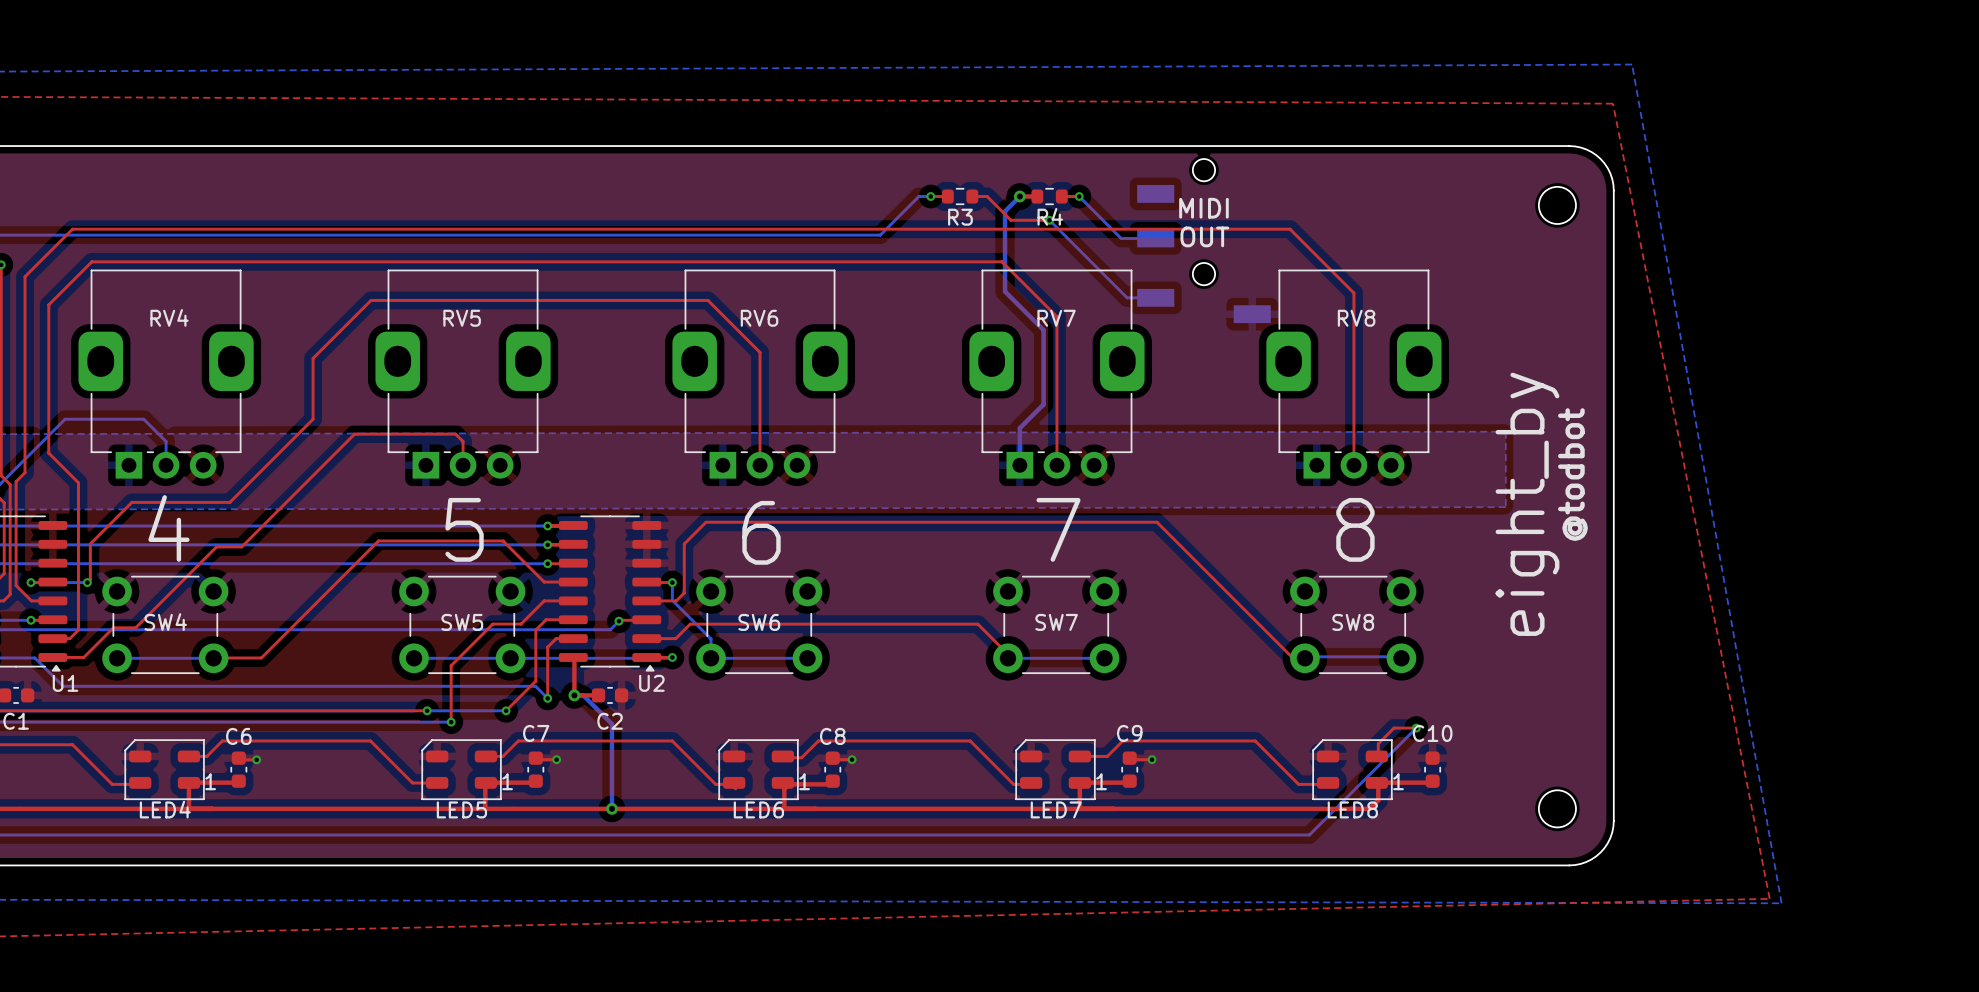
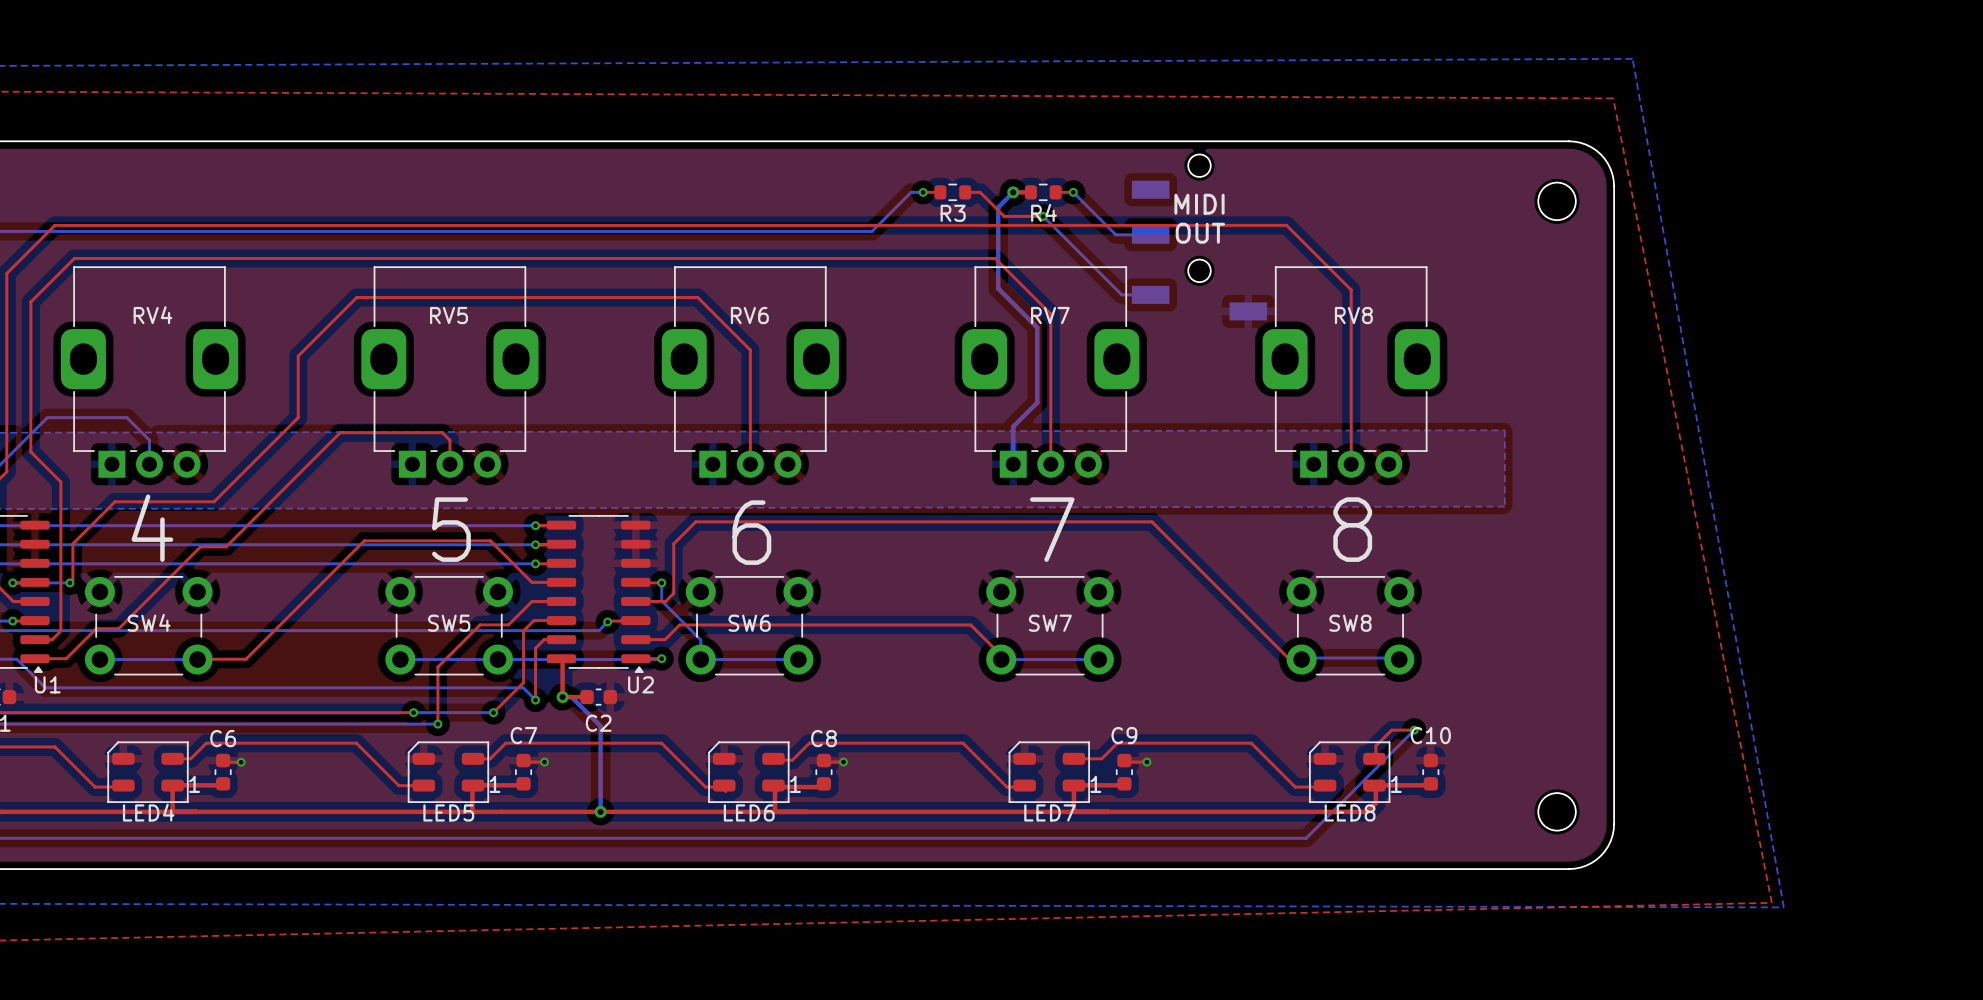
text: @todbot (1572, 474) -> none
text: eight_by (1527, 504) -> none

